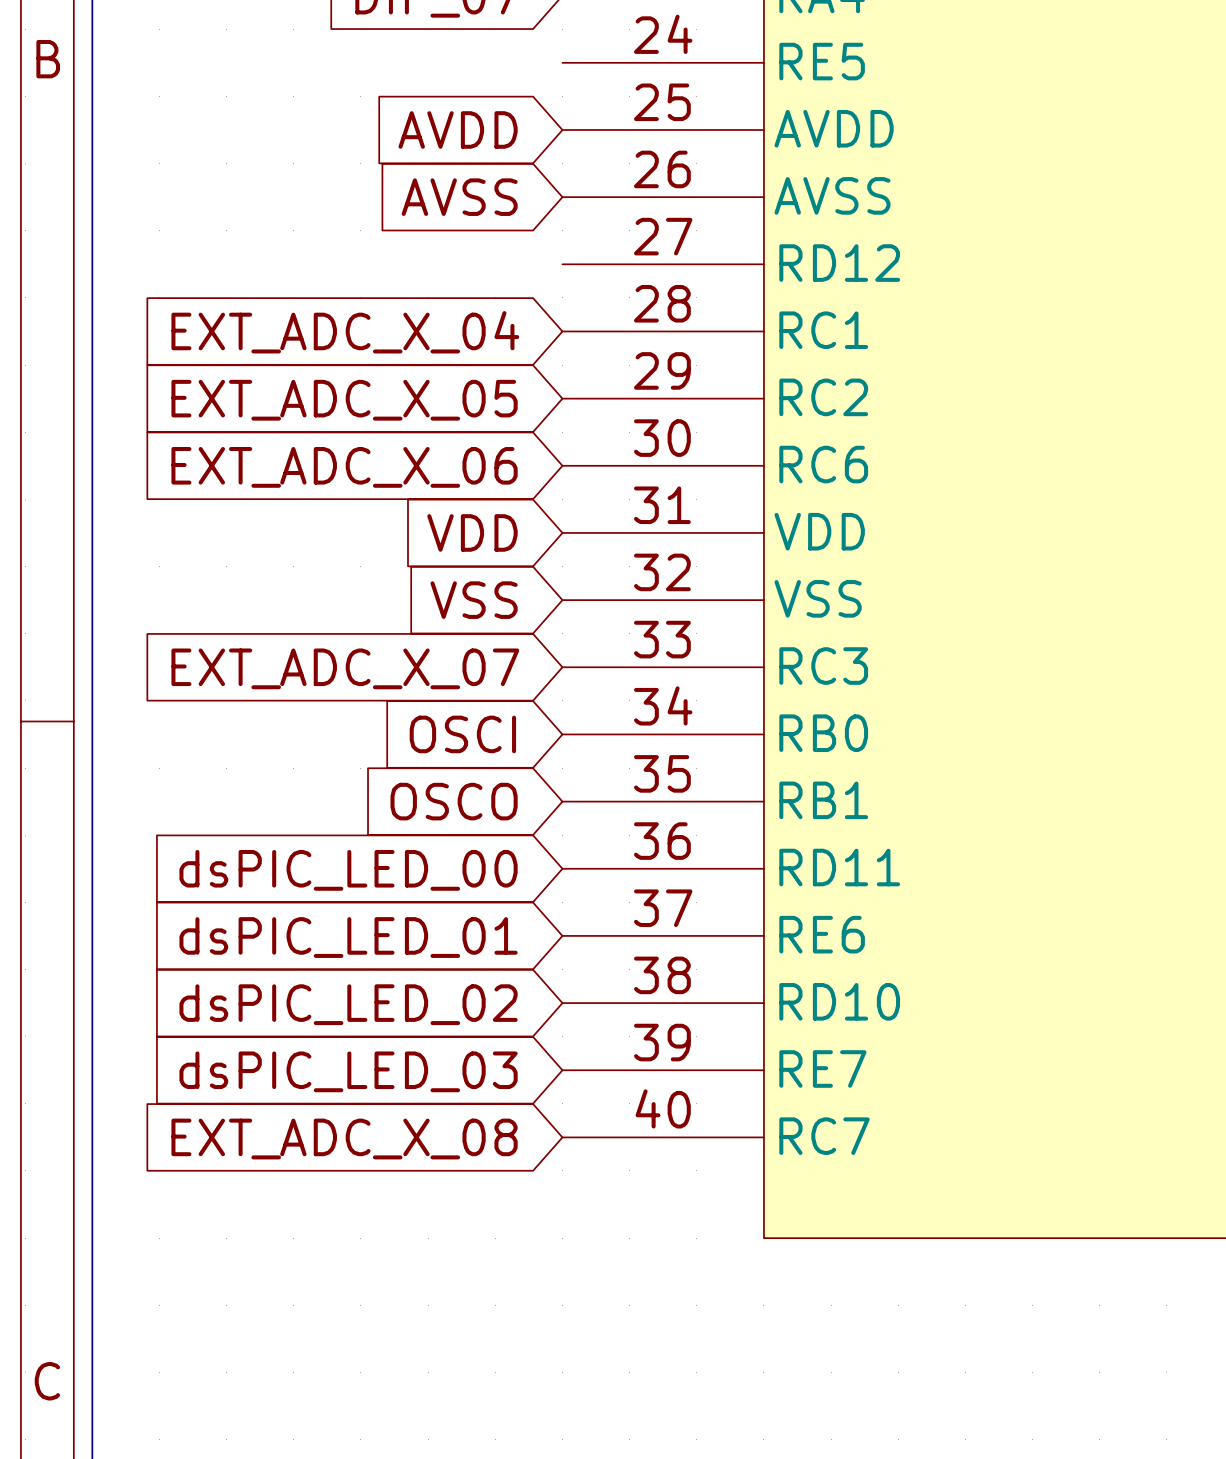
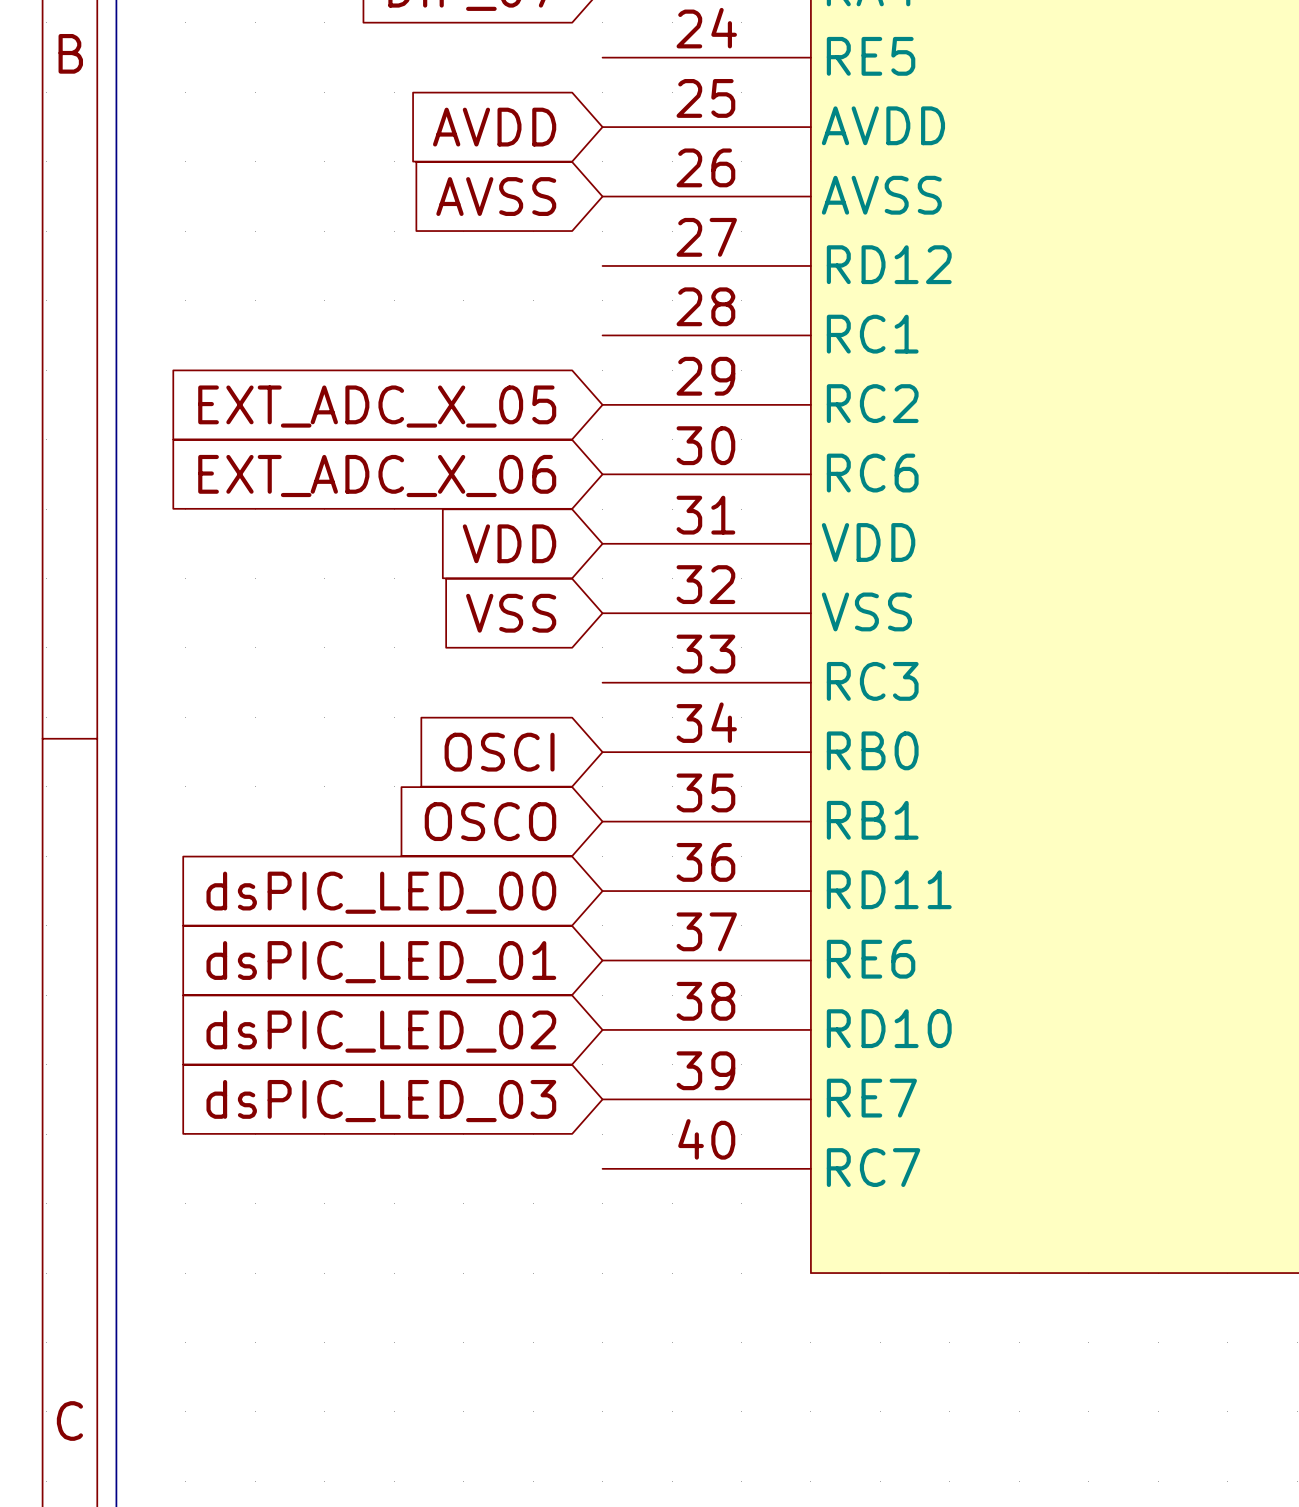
global label: EXT_ADC_X_04 (345, 332) -> none
global label: EXT_ADC_X_07 (345, 668) -> none
global label: EXT_ADC_X_08 (344, 1139) -> none

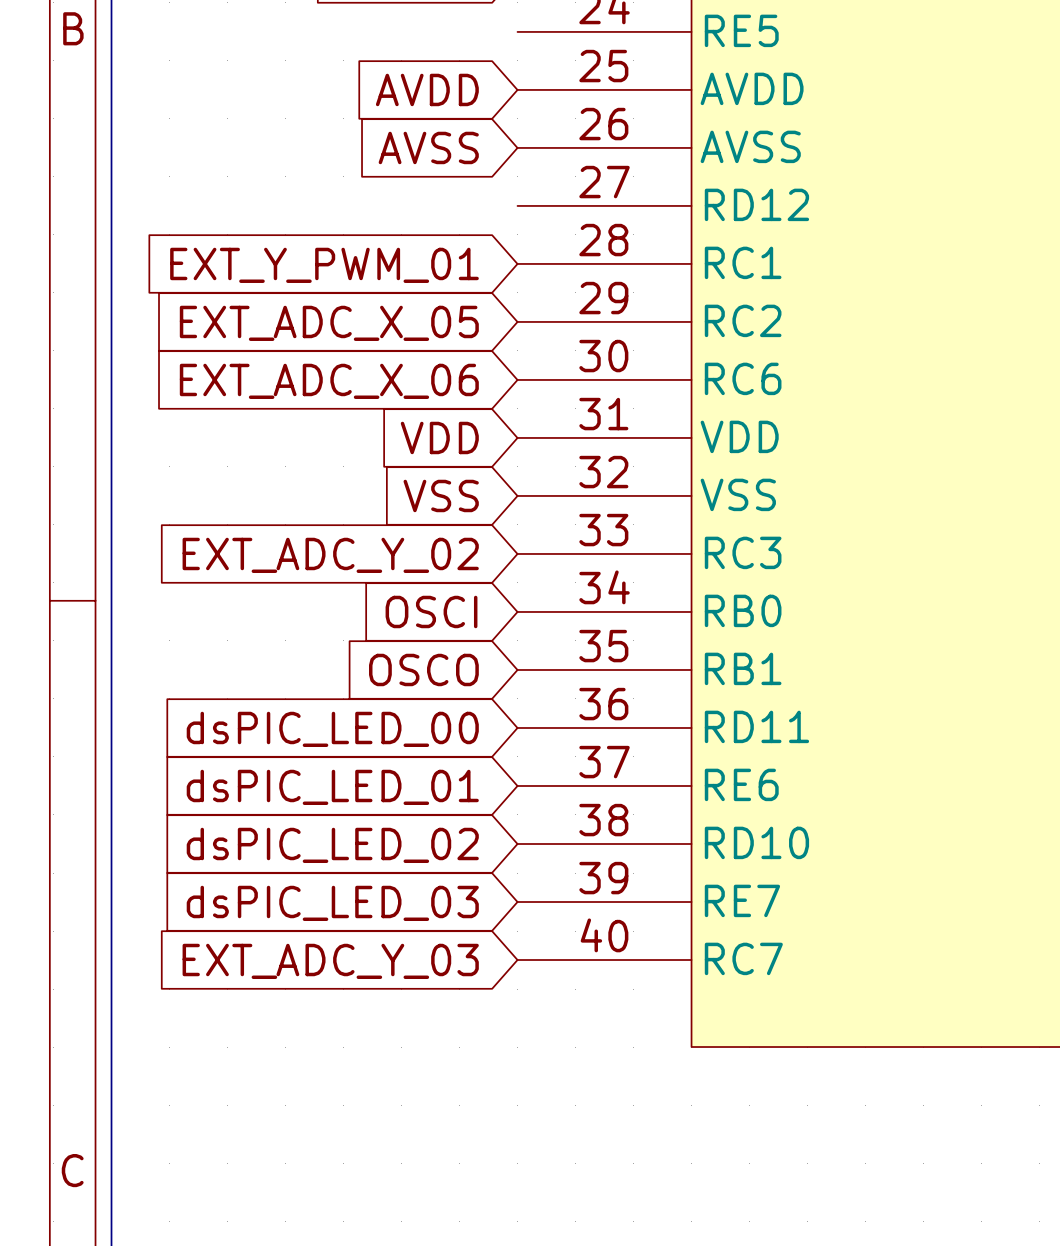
global label: none -> EXT_Y_PWM_01 (324, 265)
global label: none -> EXT_ADC_Y_02 (330, 555)
global label: none -> EXT_ADC_Y_03 (330, 961)

